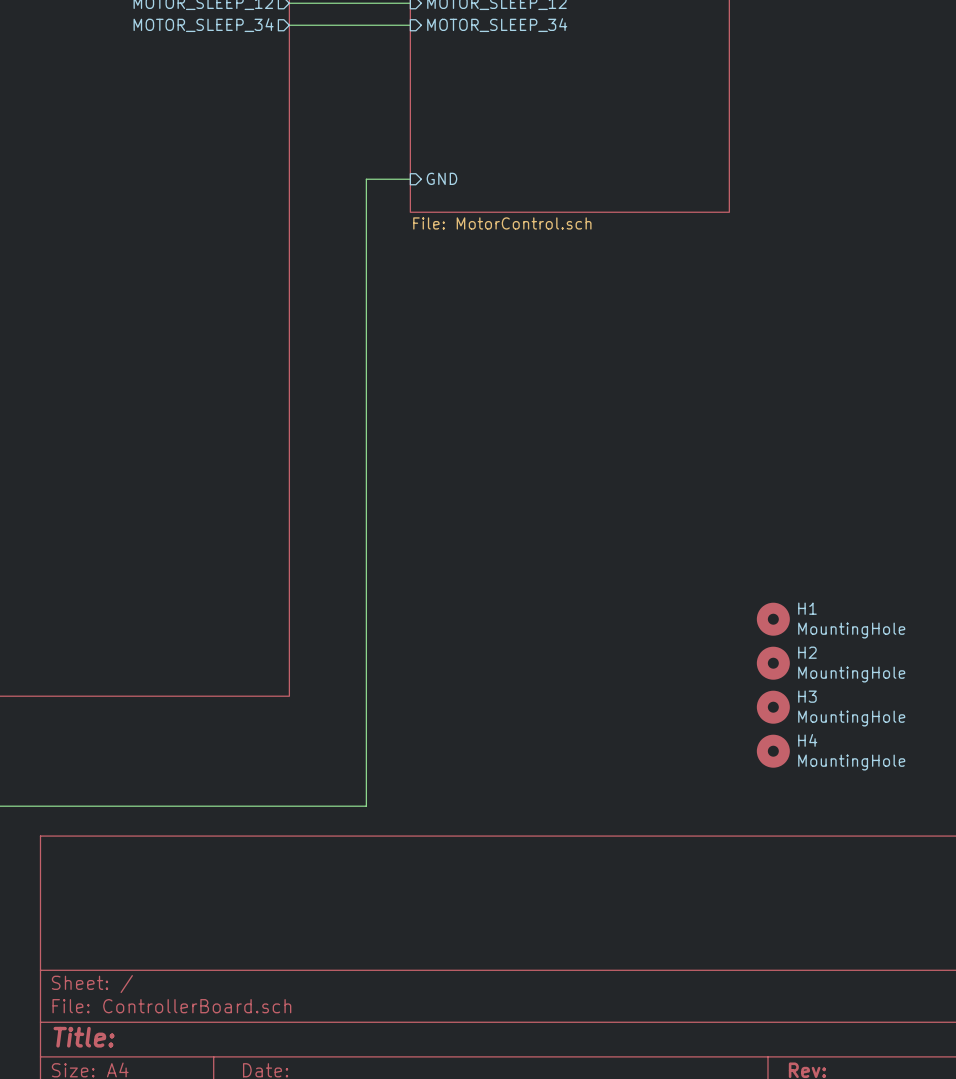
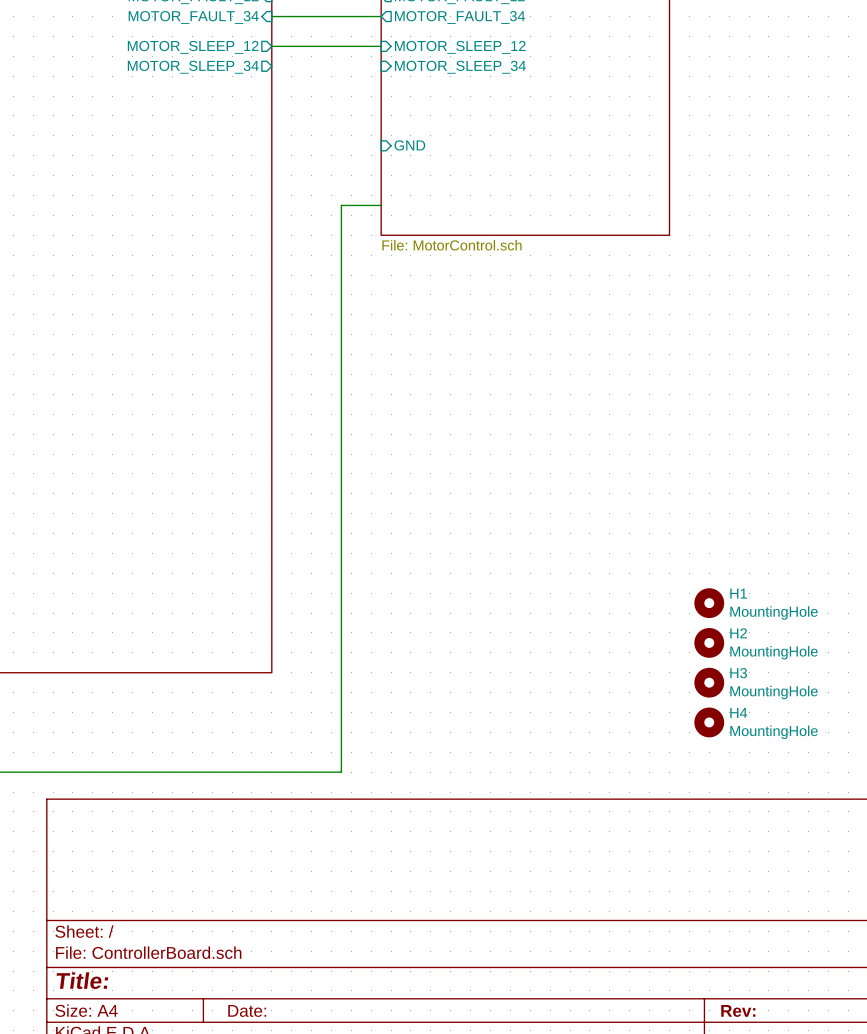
wire: (289, 25) (410, 25) -> none
sheet pin position: GND (441, 178) -> GND (409, 145)

